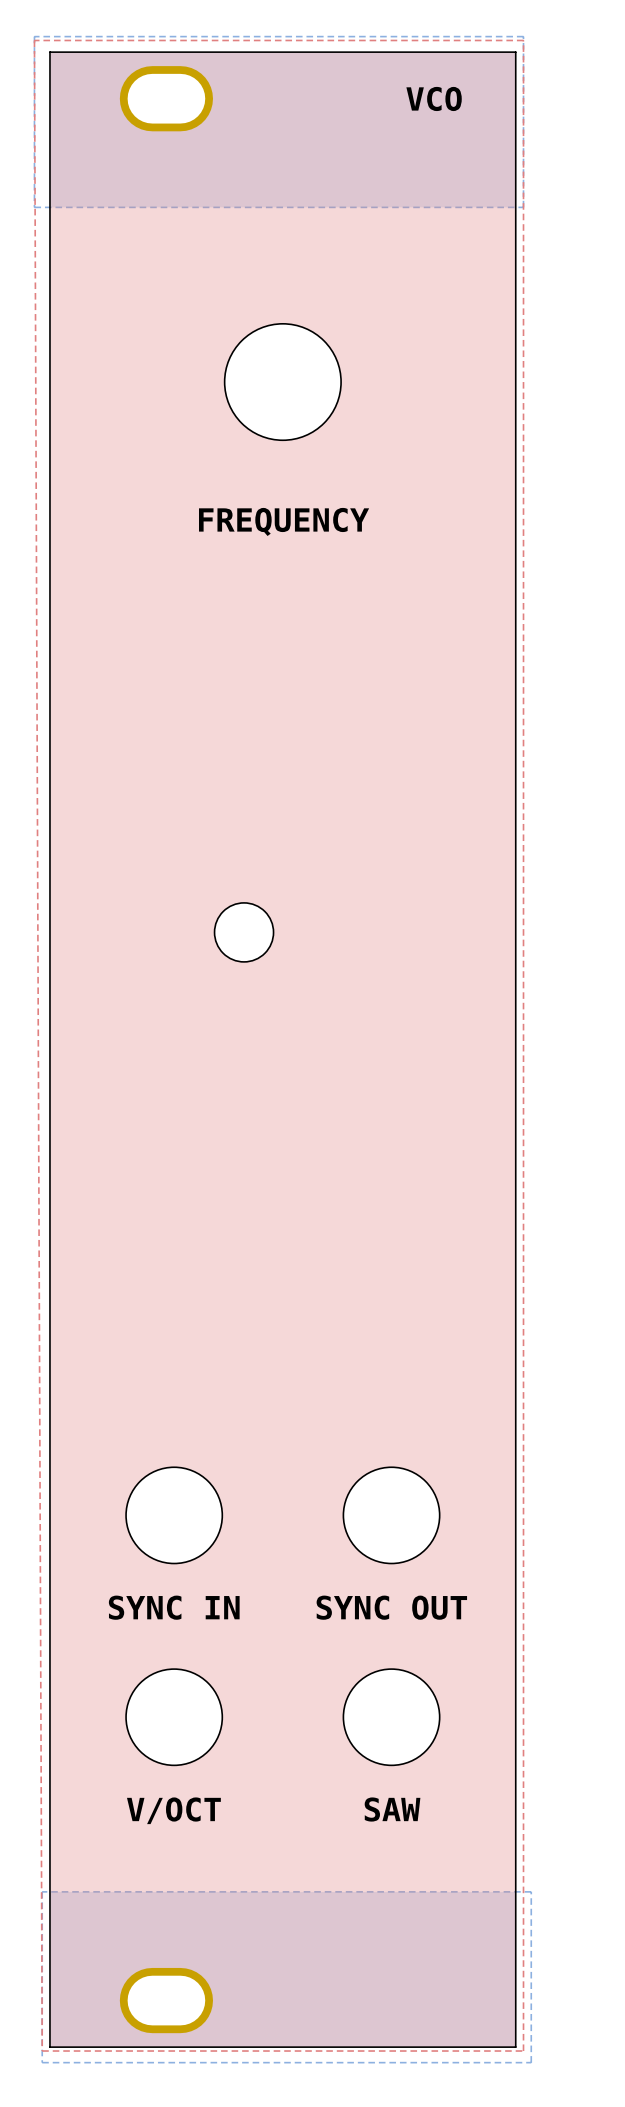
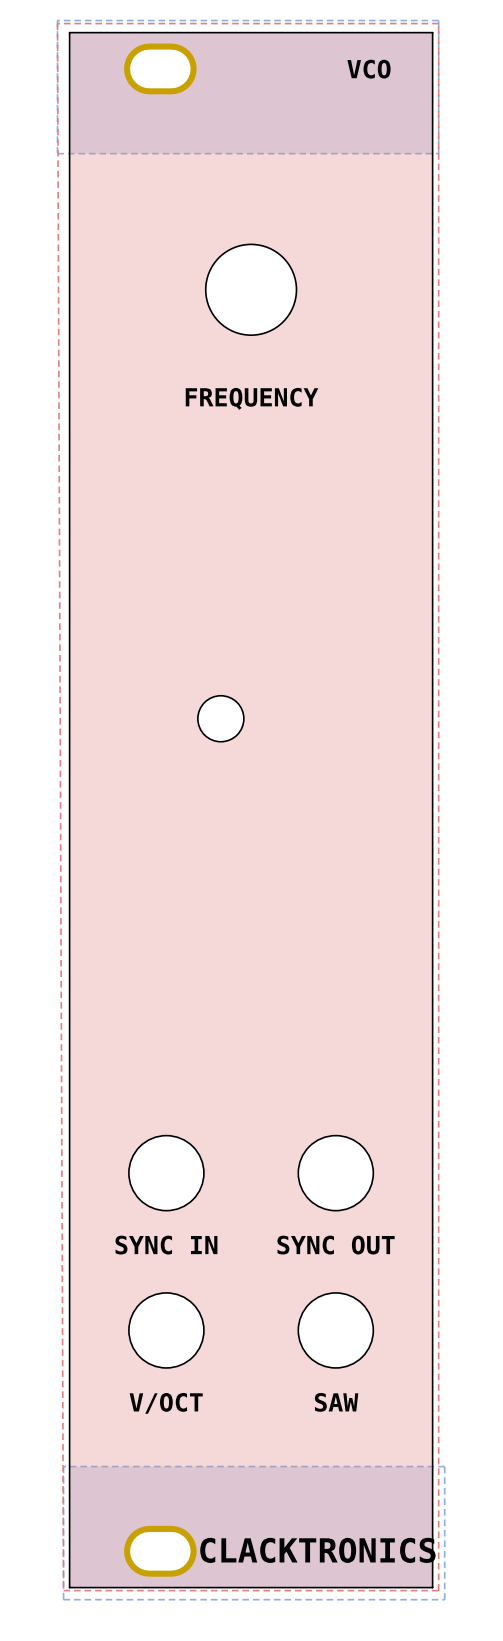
text: none -> CLACKTRONICS (317, 1550)

